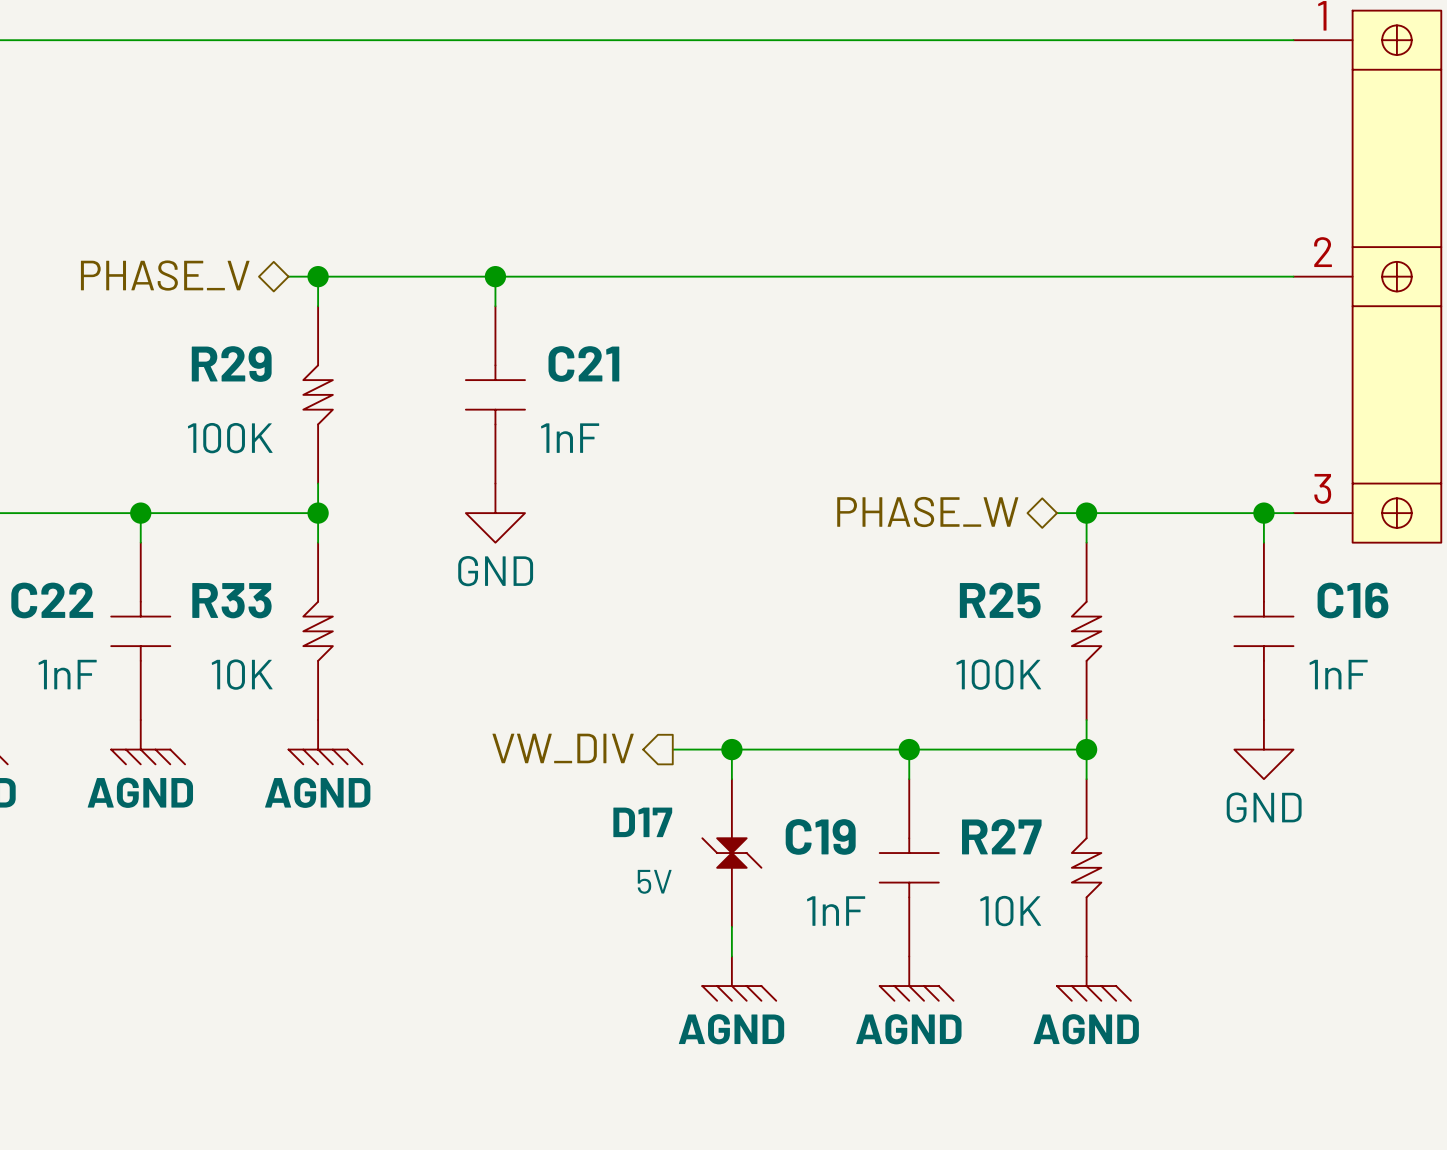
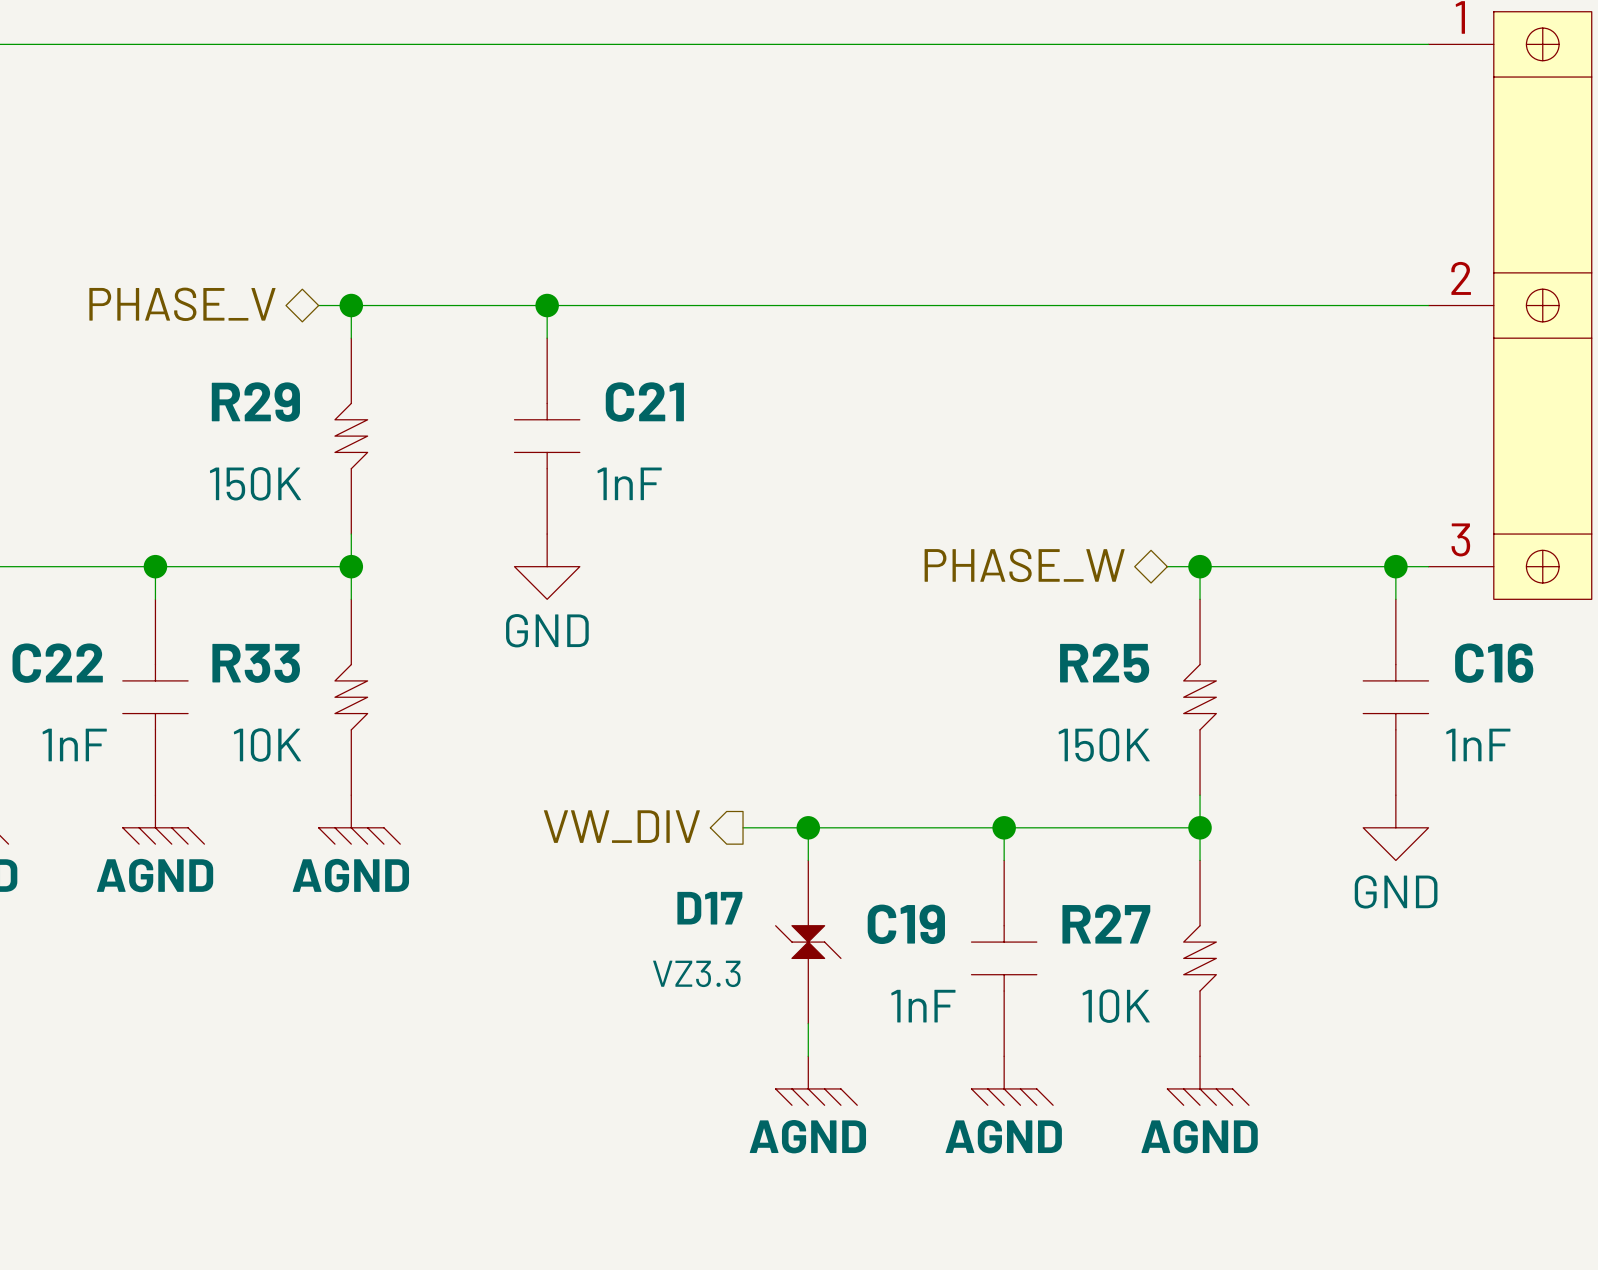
R29 value: 100K (230, 438) -> 150K (255, 483)
R25 value: 100K (998, 674) -> 150K (1104, 745)
D17 value: 5V (654, 881) -> VZ3.3 (696, 973)

